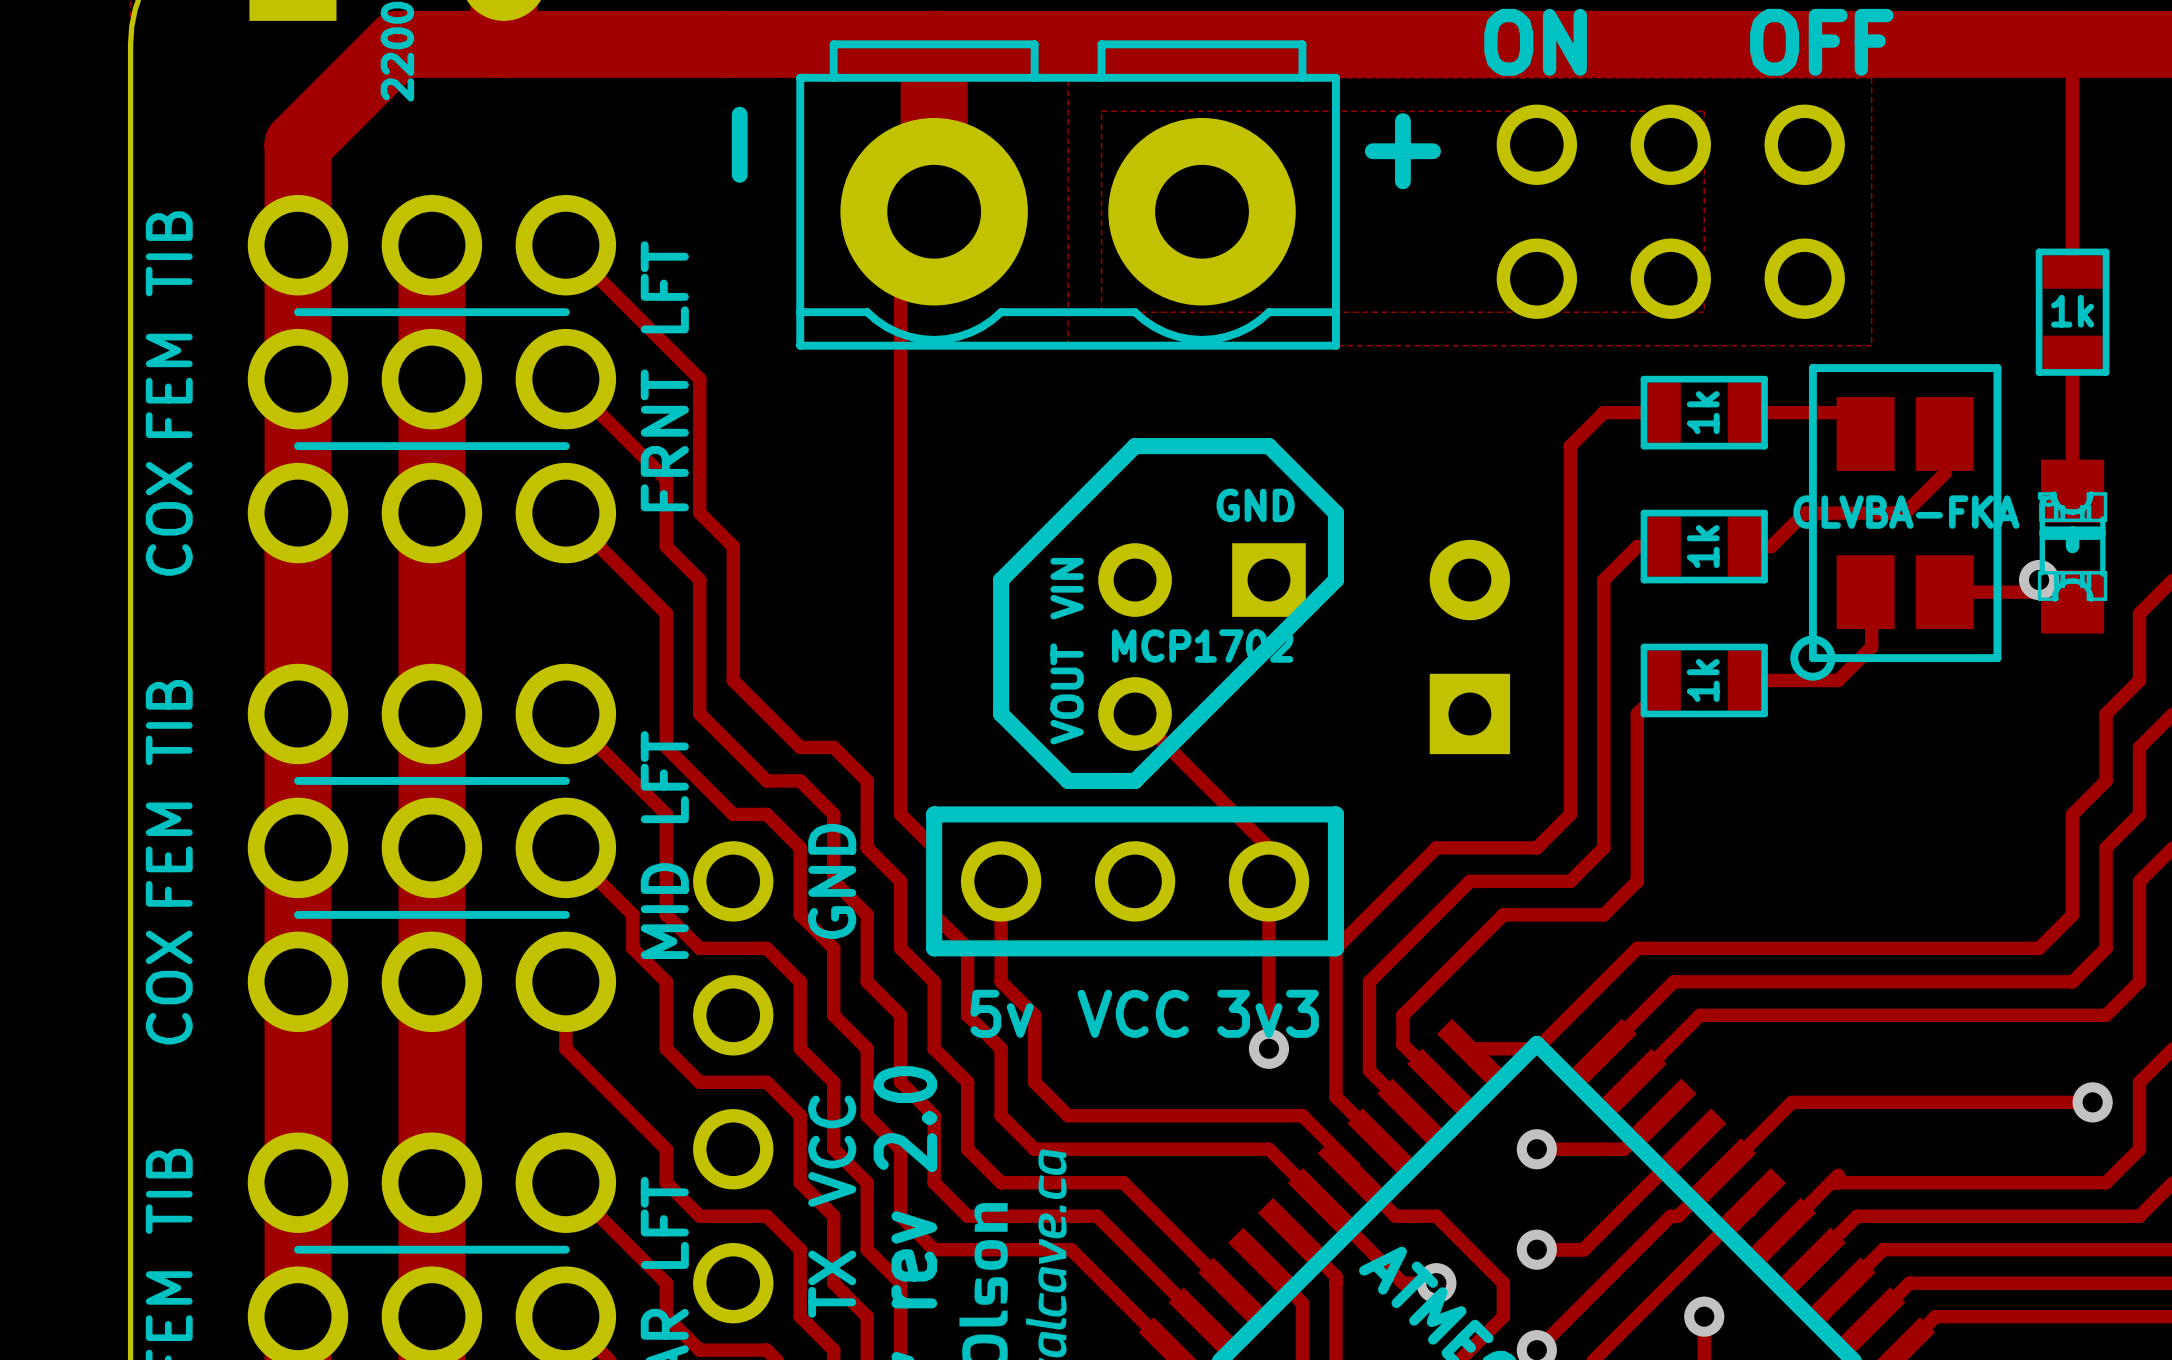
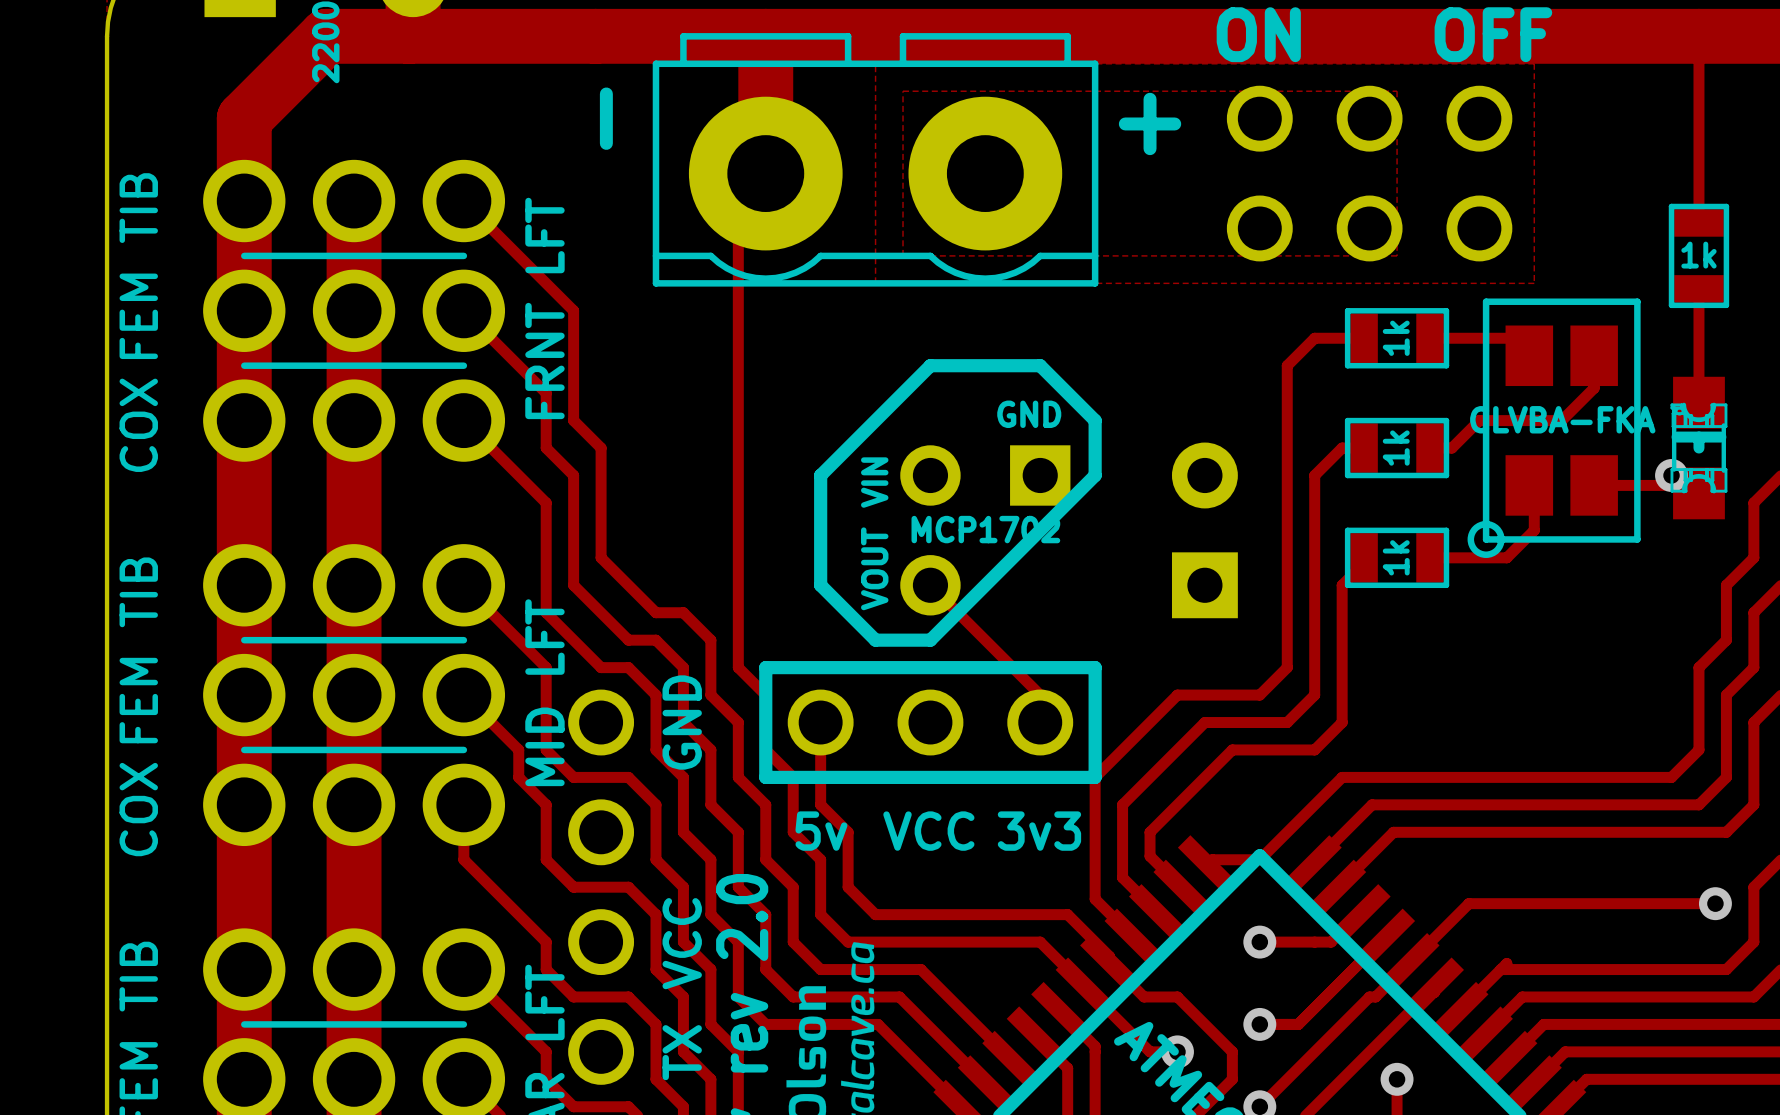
track: (1268, 881) (1268, 1048) -> none
via: (1268, 1048) -> none

